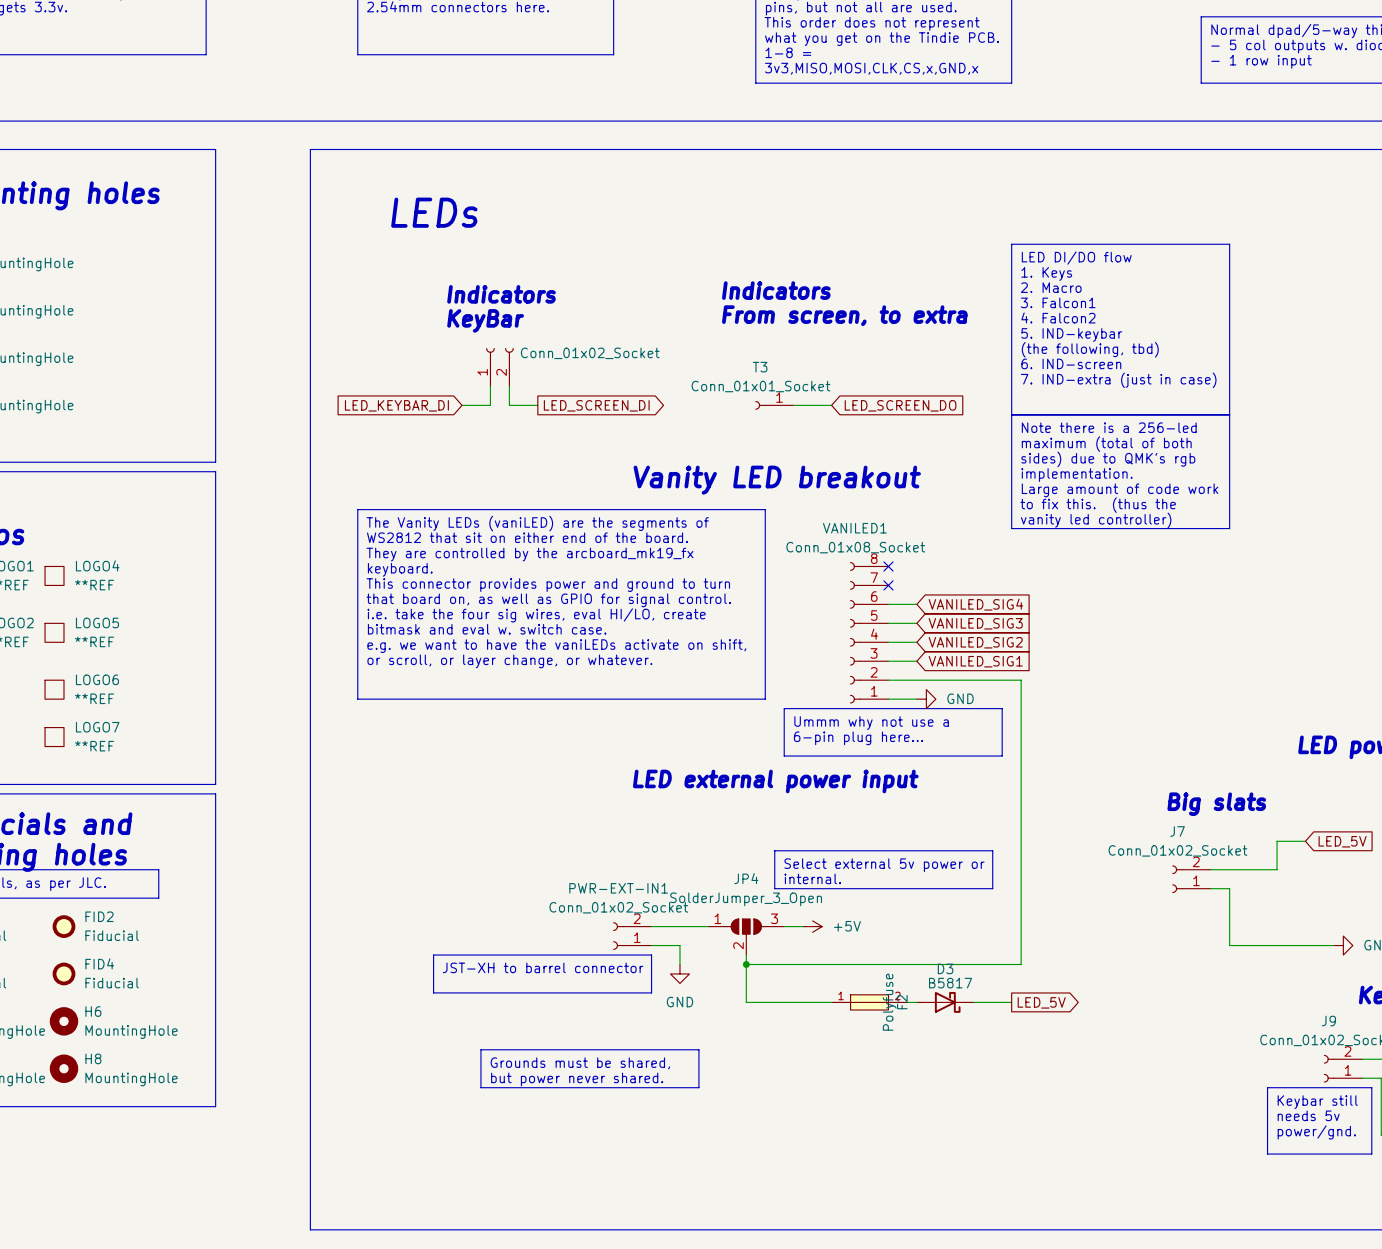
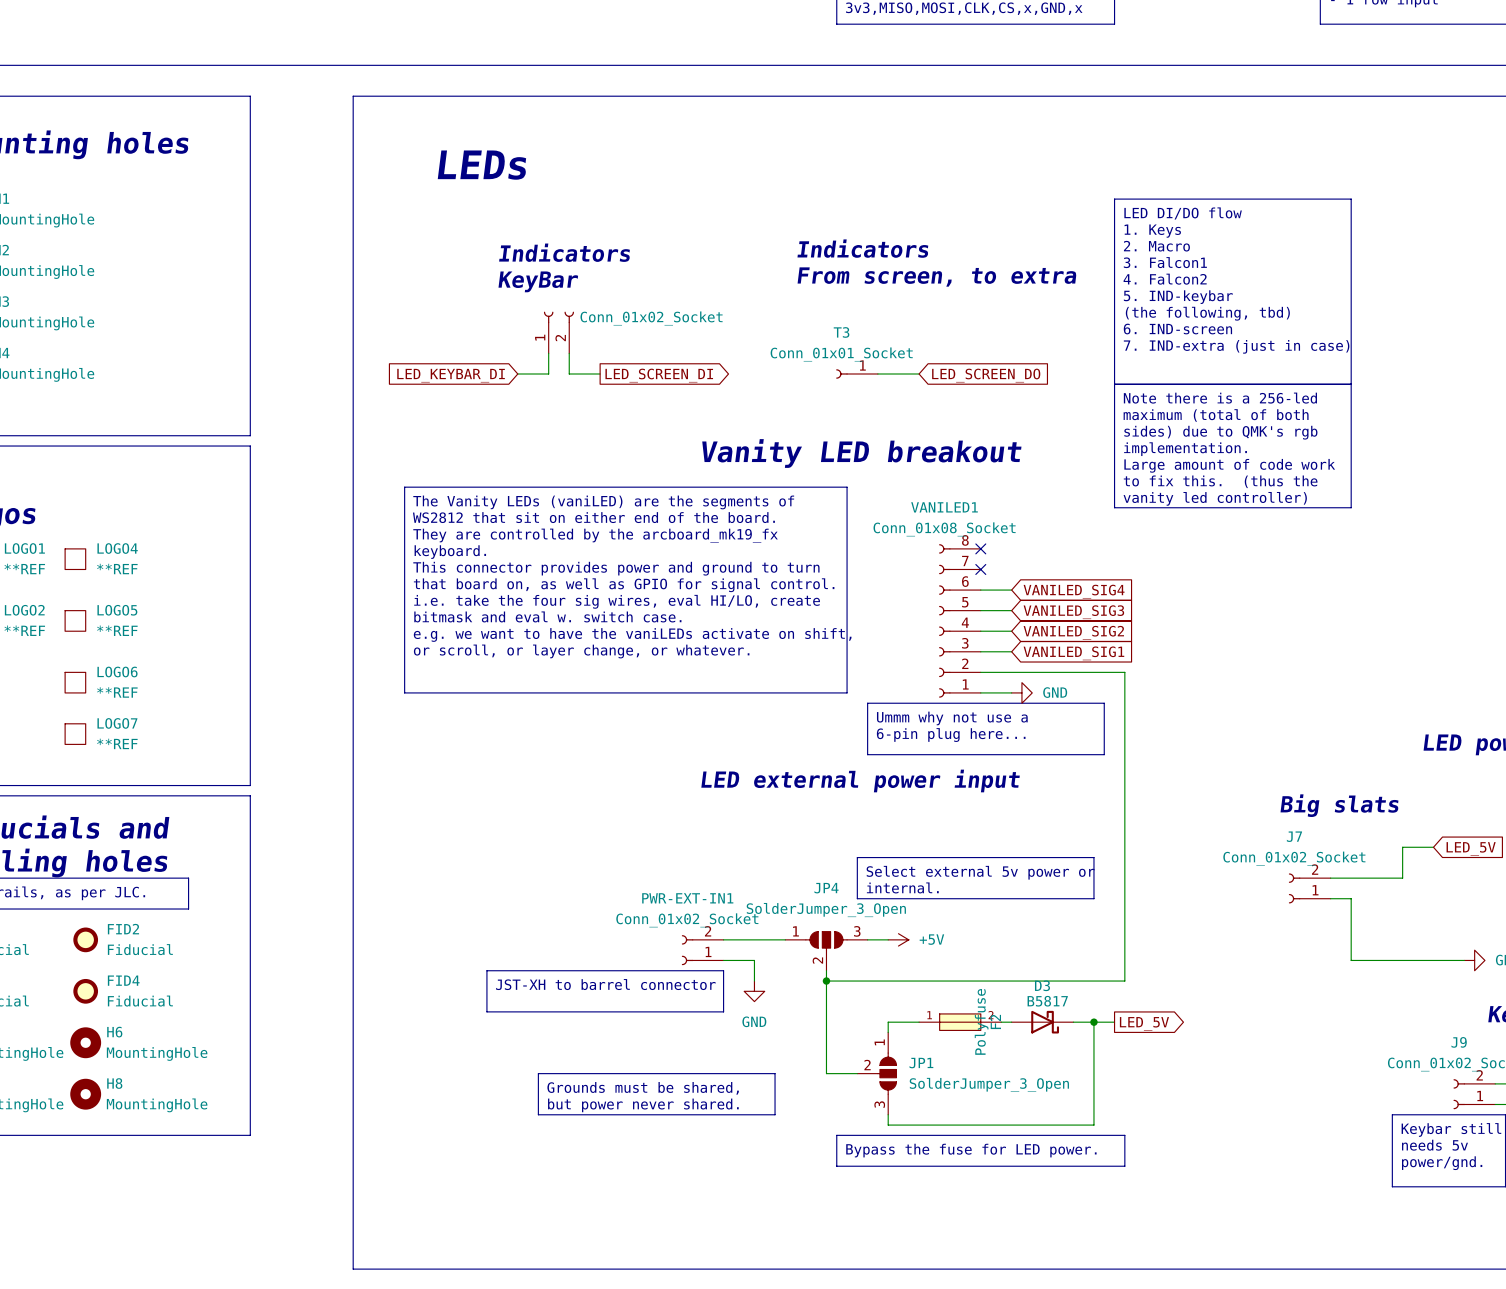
wire: (746, 1002) (803, 1002) -> (826, 1022) (826, 1073) (857, 1073)
wire: none -> (888, 1022) (888, 1032)
wire: none -> (1093, 1022) (1093, 1125) (888, 1125) (888, 1114)
junction: none -> (1093, 1022)
JP1: none -> SolderJumper_3_Open (876, 1073)
line: none -> (836, 1135) (1124, 1135) (1124, 1166) (836, 1166) (836, 1135)
text: none -> Bypass the fuse for LED power. (971, 1150)

